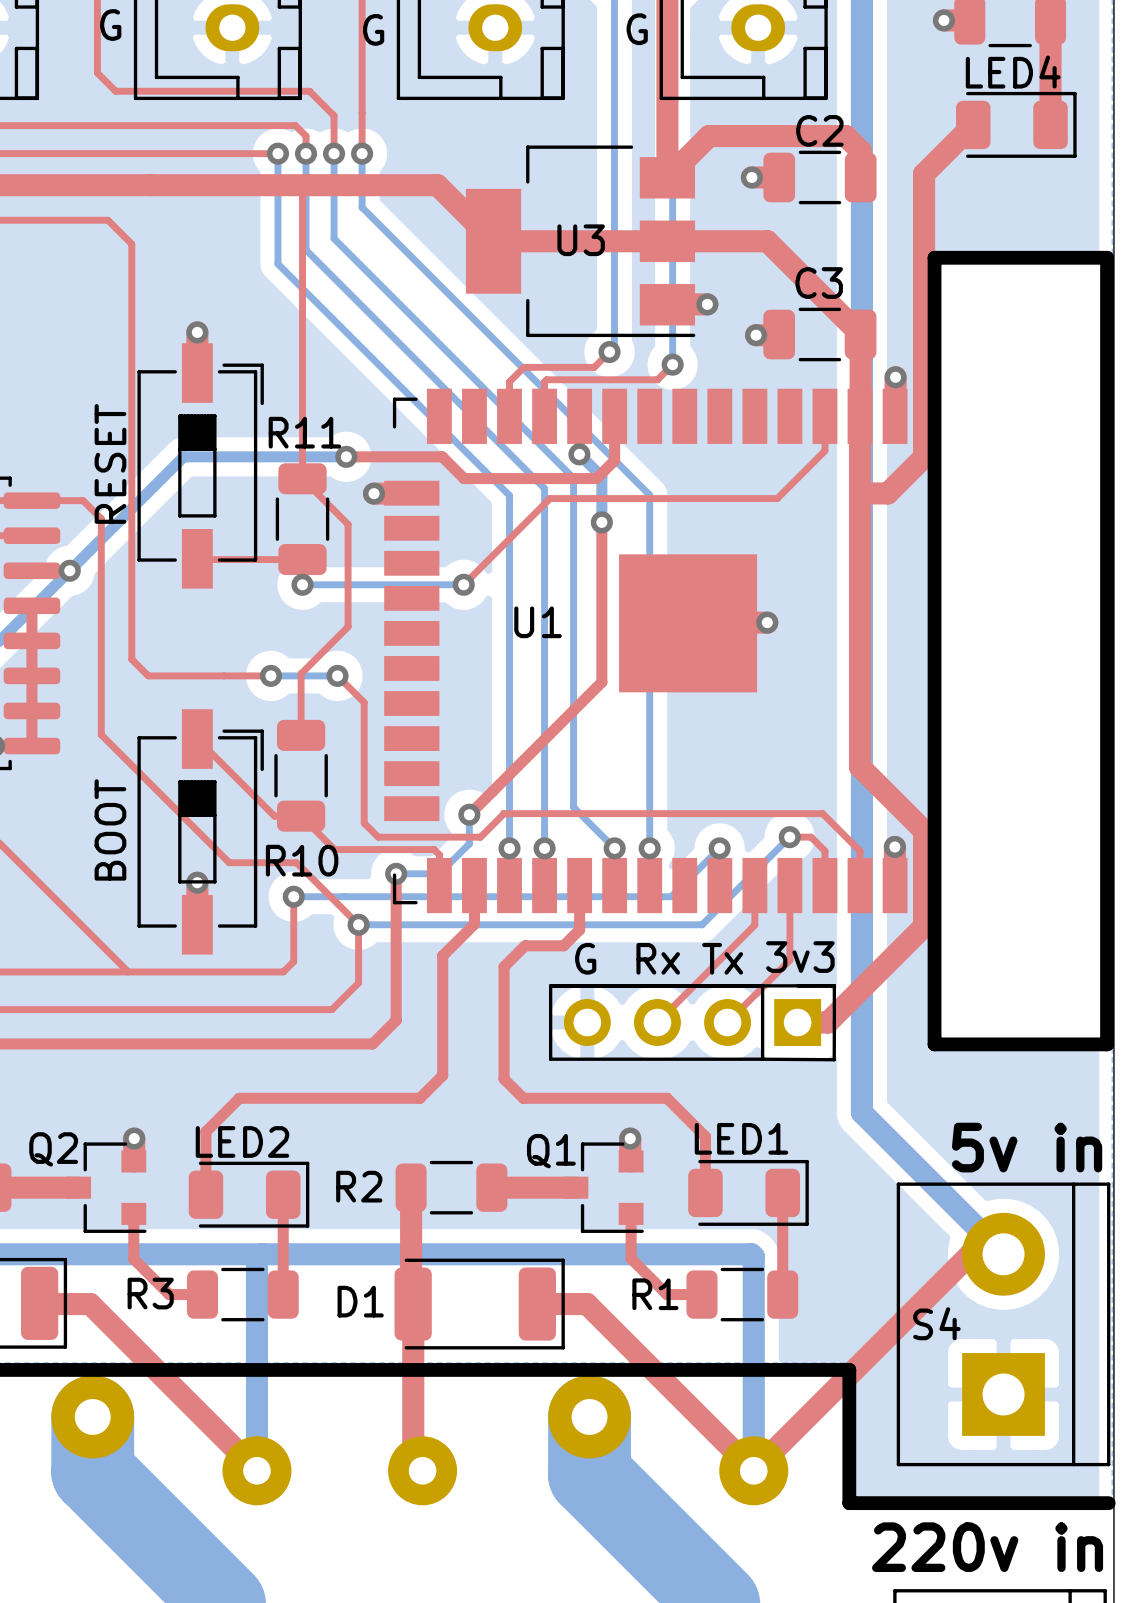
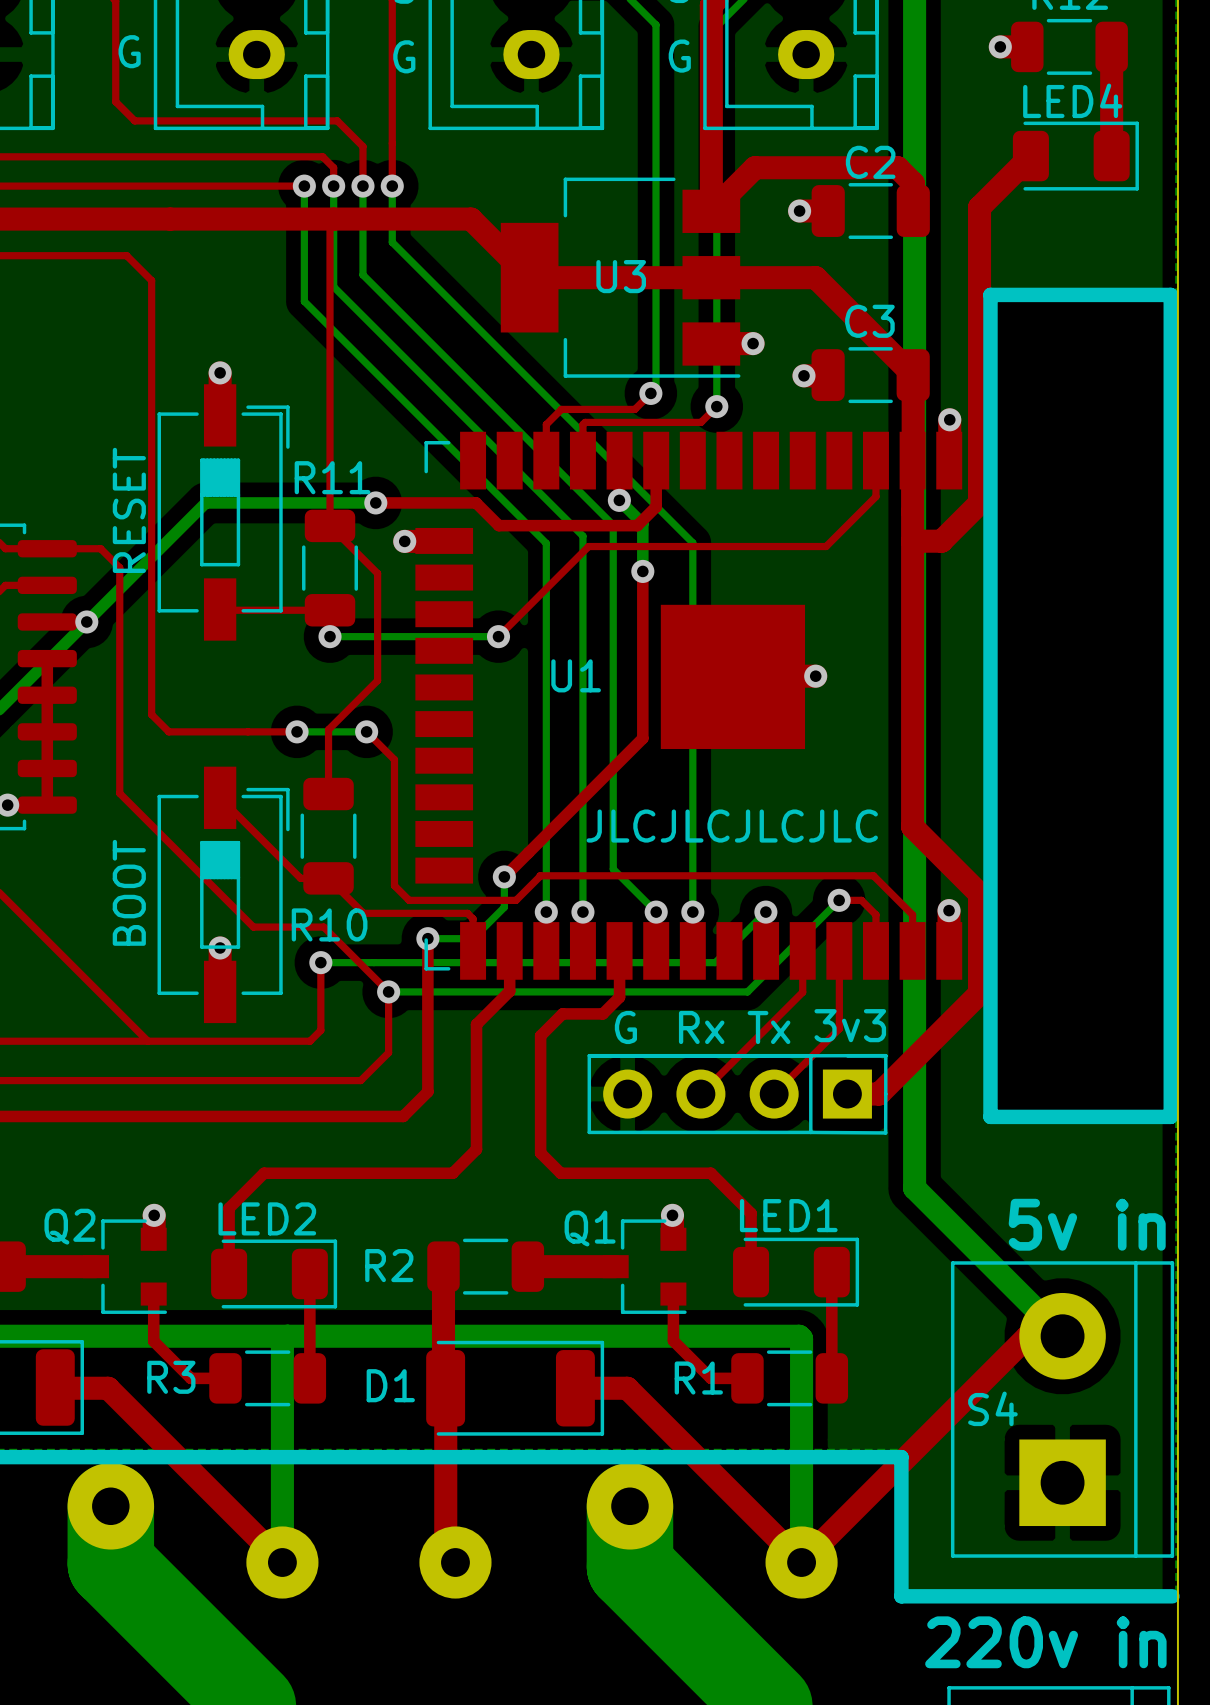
text: none -> JLCJLCJLCJLC (732, 826)

